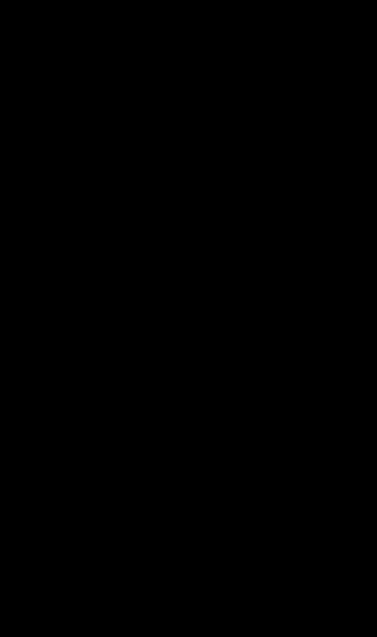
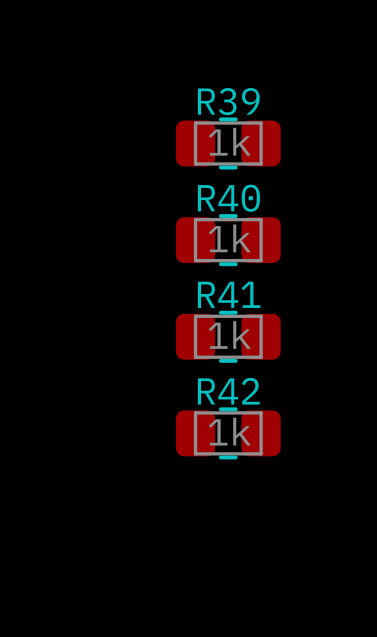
R39: none -> 1k (228, 143)
R40: none -> 1k (228, 240)
R41: none -> 1k (228, 336)
R42: none -> 1k (228, 433)

